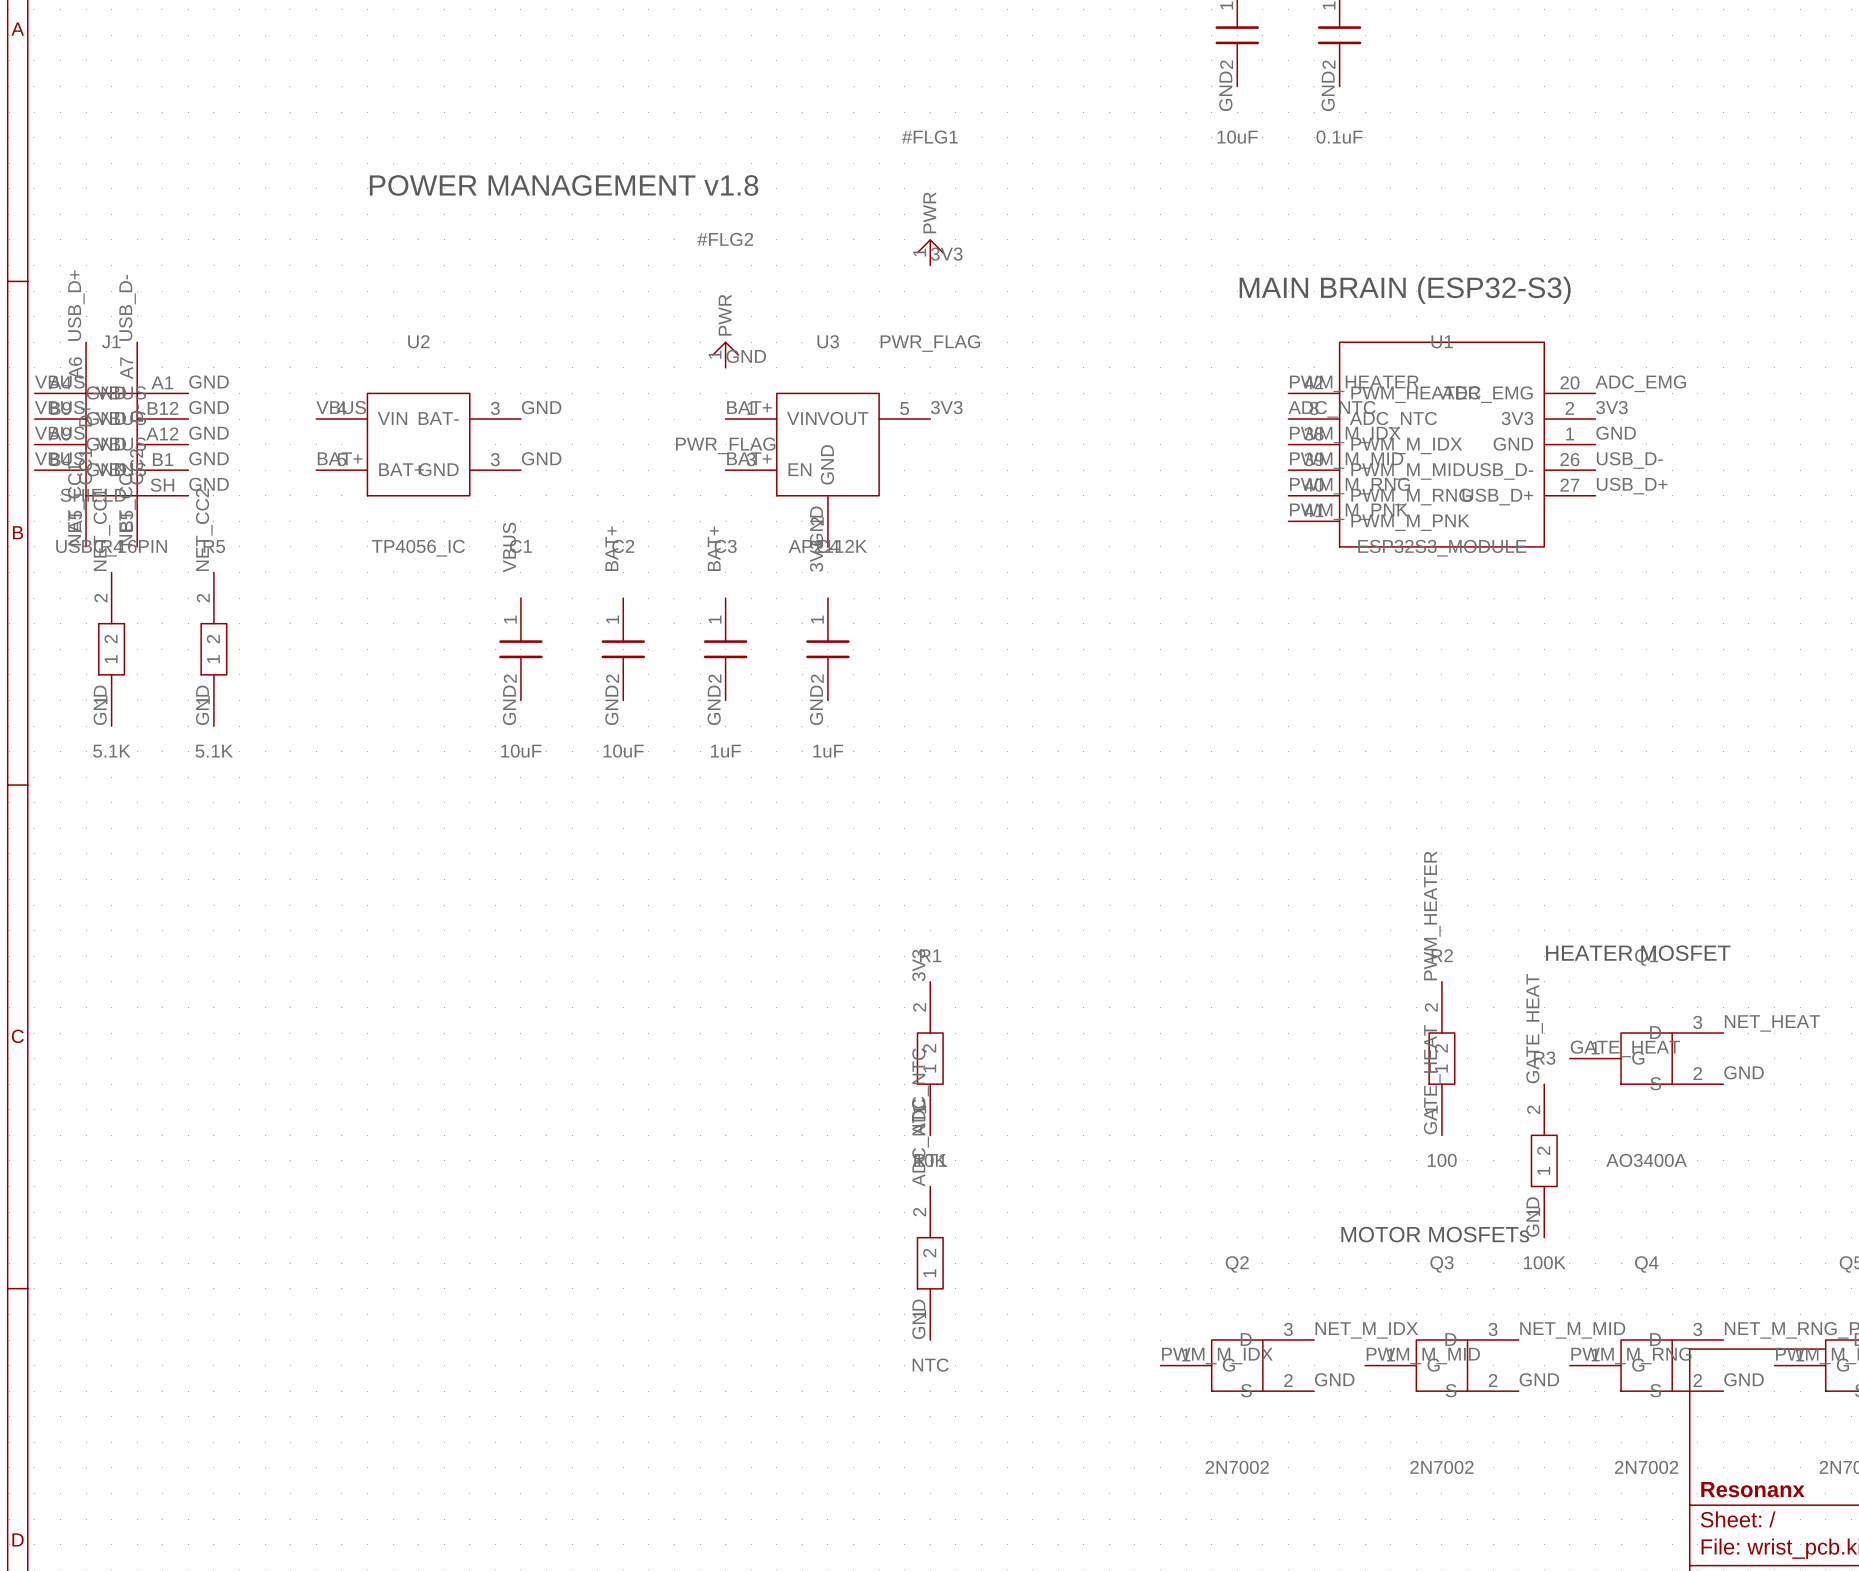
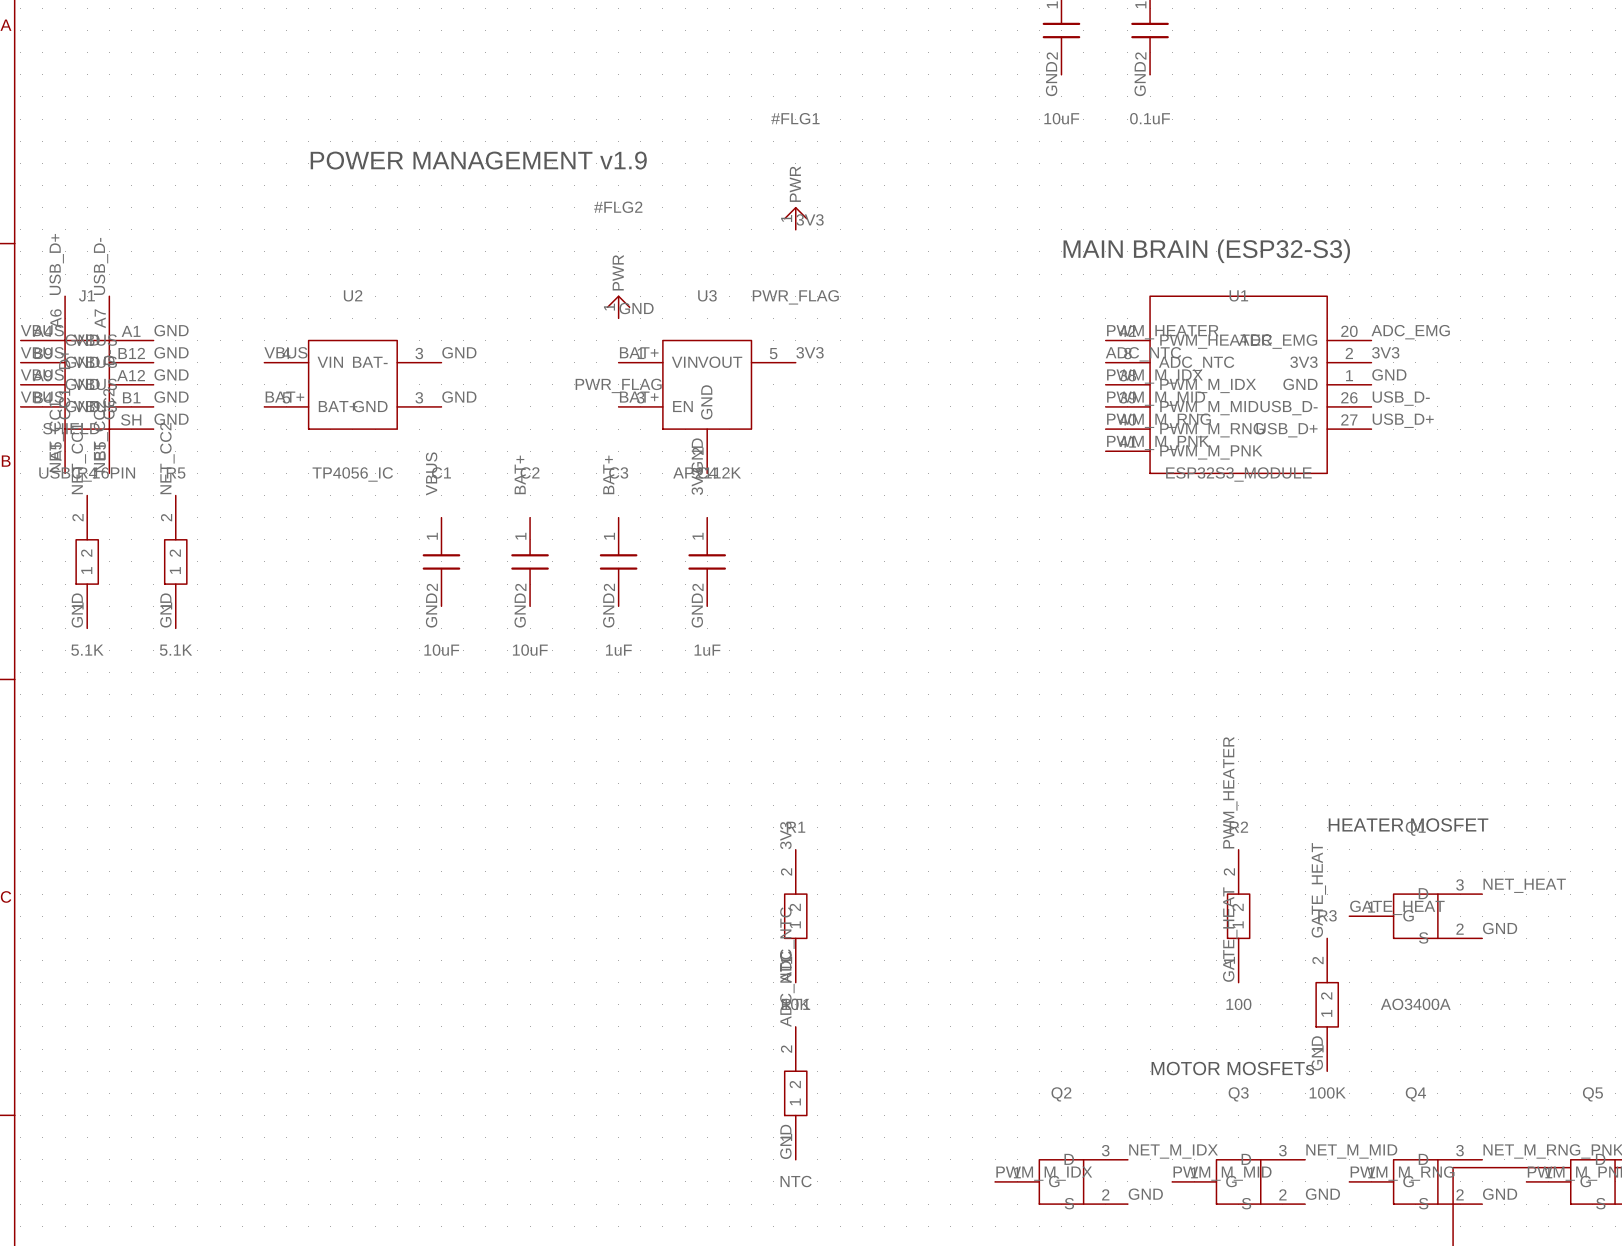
text: POWER MANAGEMENT v1.8 (564, 185) -> POWER MANAGEMENT v1.9 (478, 160)

